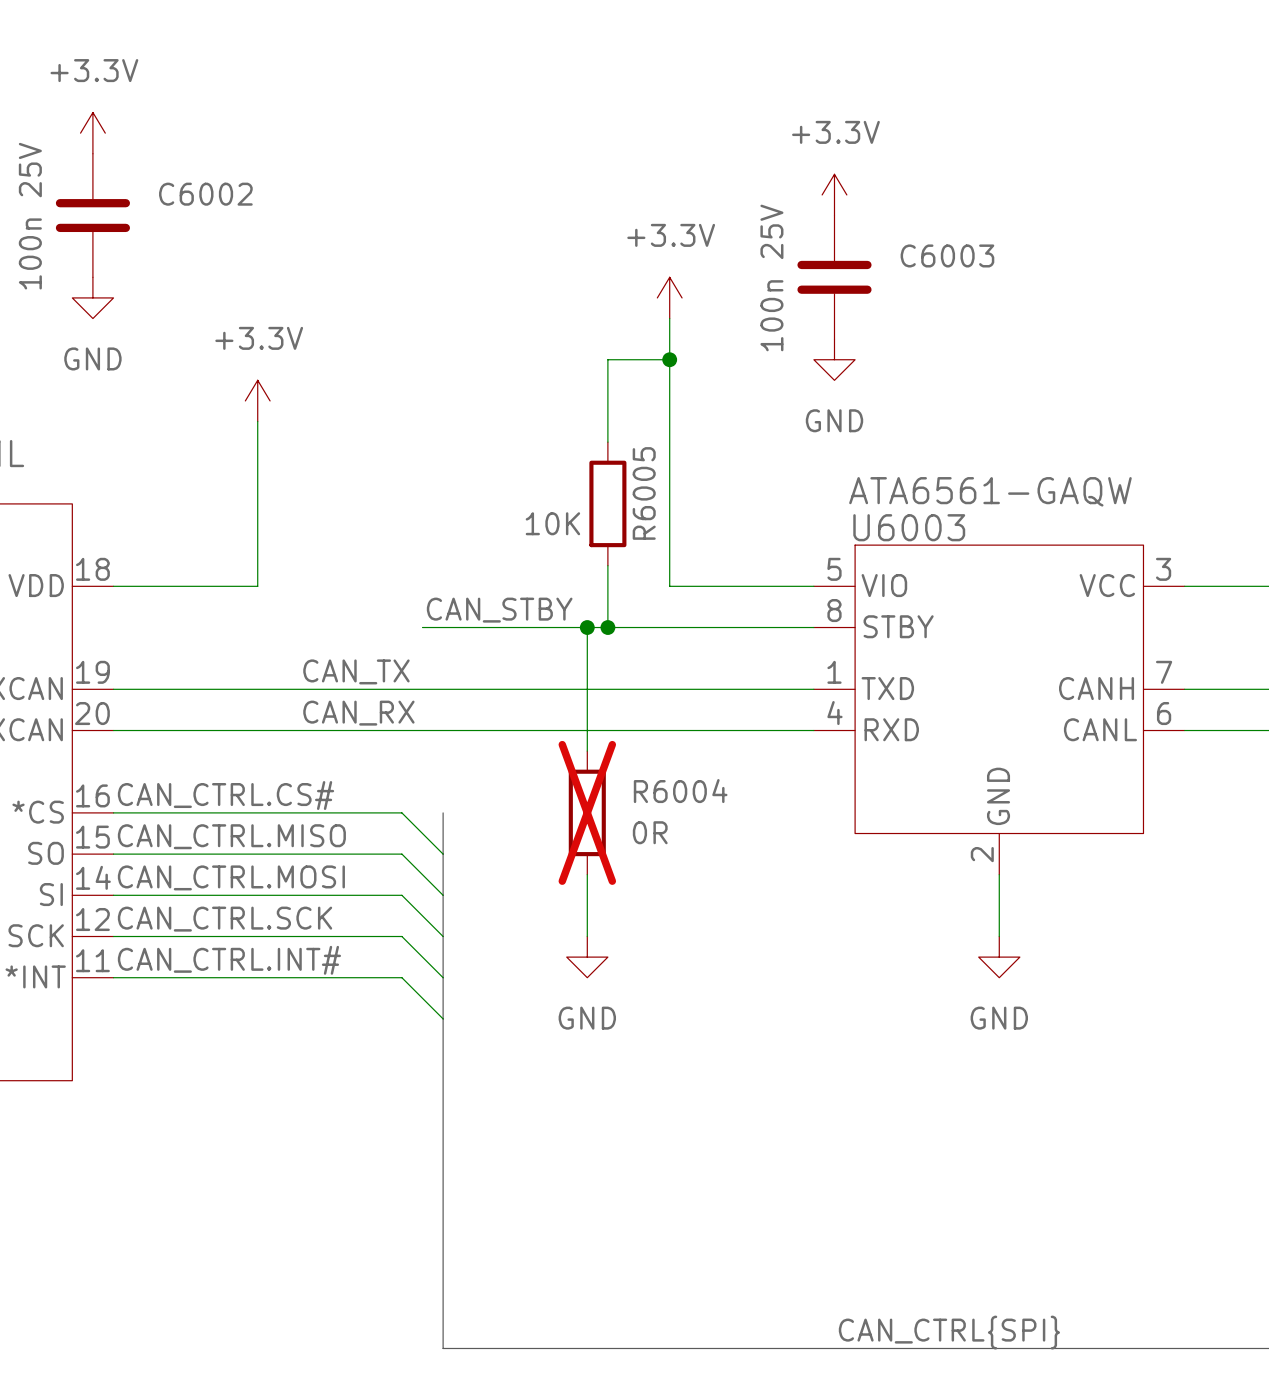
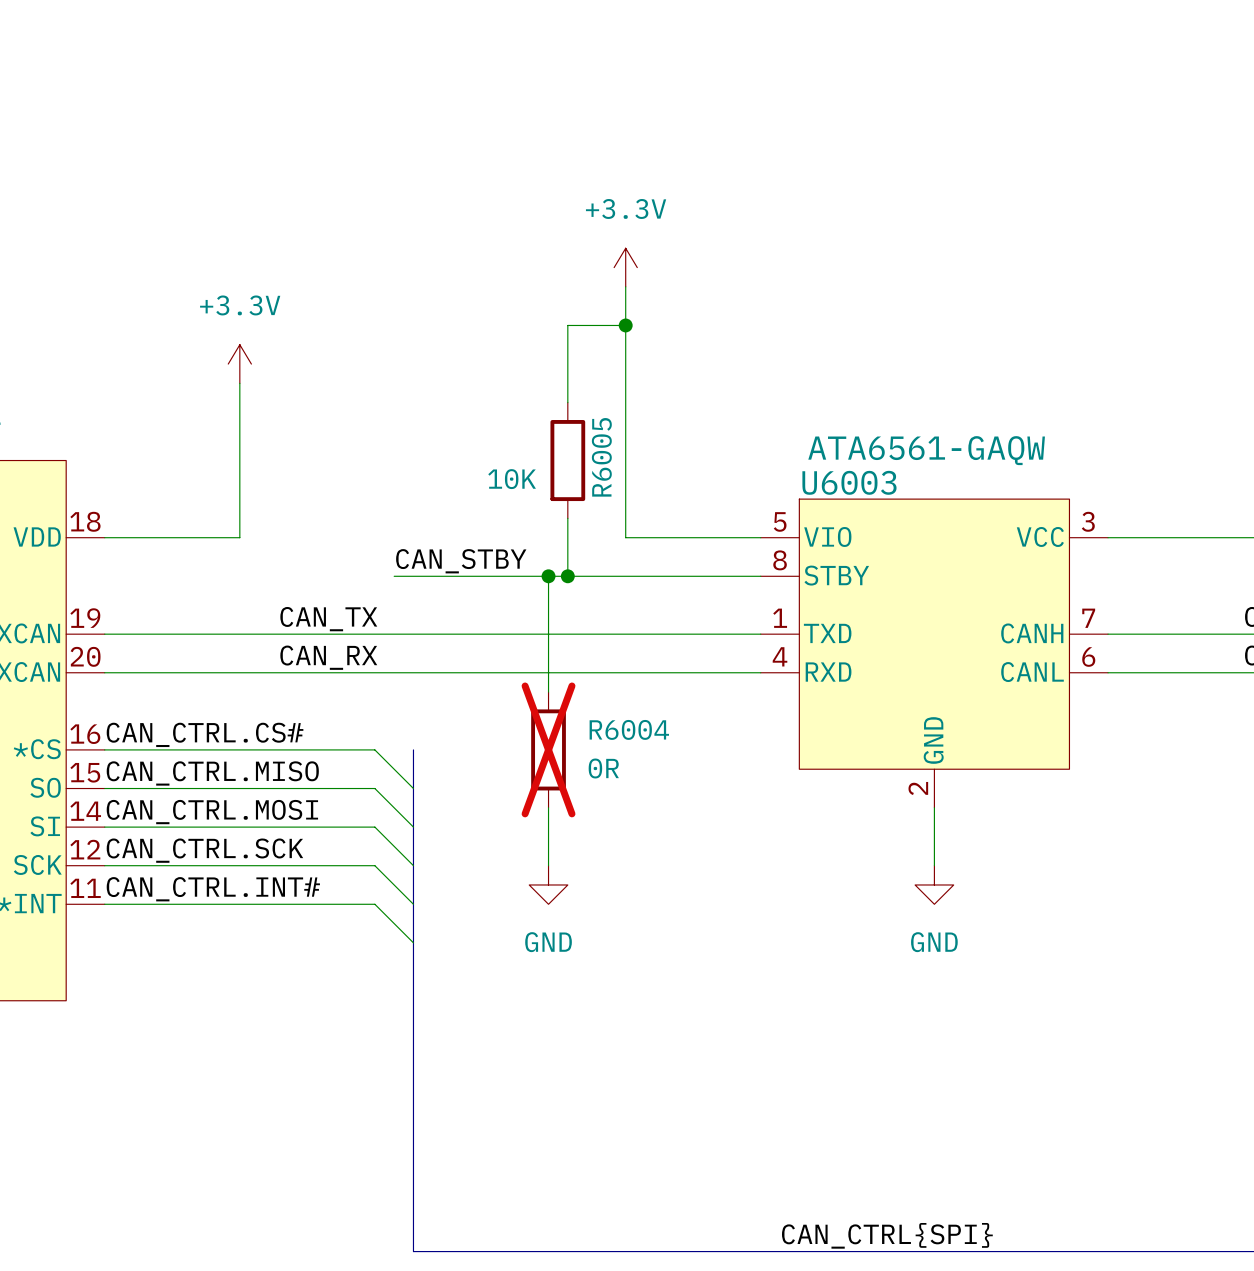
power symbol: +3.3V (92, 133) -> none
power symbol: +3.3V (834, 194) -> none
C6002: 100n 25V (92, 215) -> none
C6003: 100n 25V (834, 277) -> none
power symbol: GND (92, 297) -> none
power symbol: GND (834, 359) -> none

